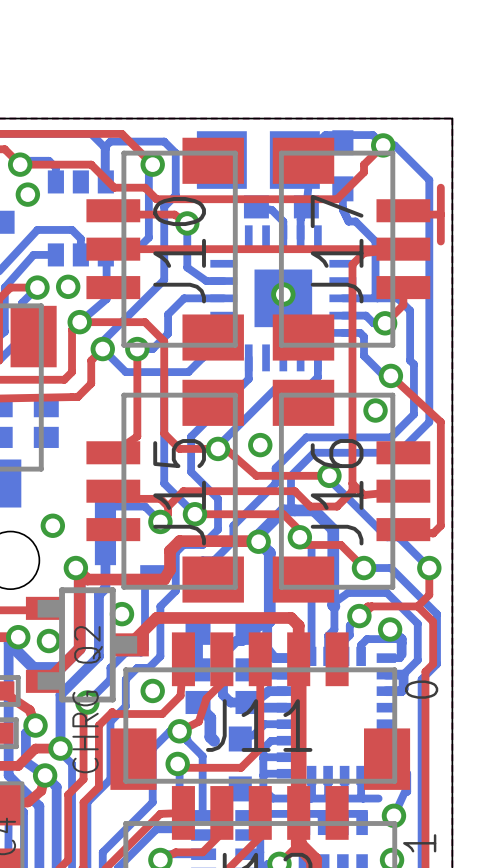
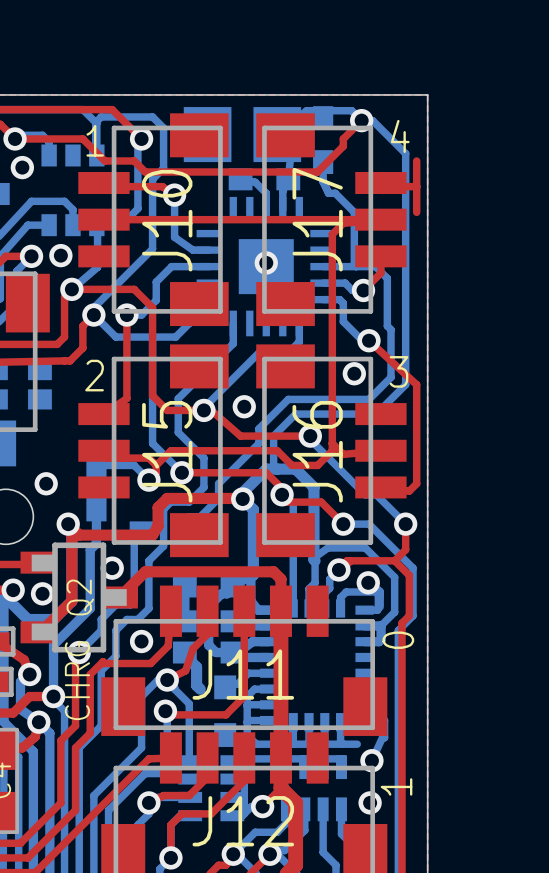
text: none -> 4 (400, 136)
text: none -> 1 (95, 140)
text: none -> 3 (399, 371)
text: none -> 2 (94, 375)

